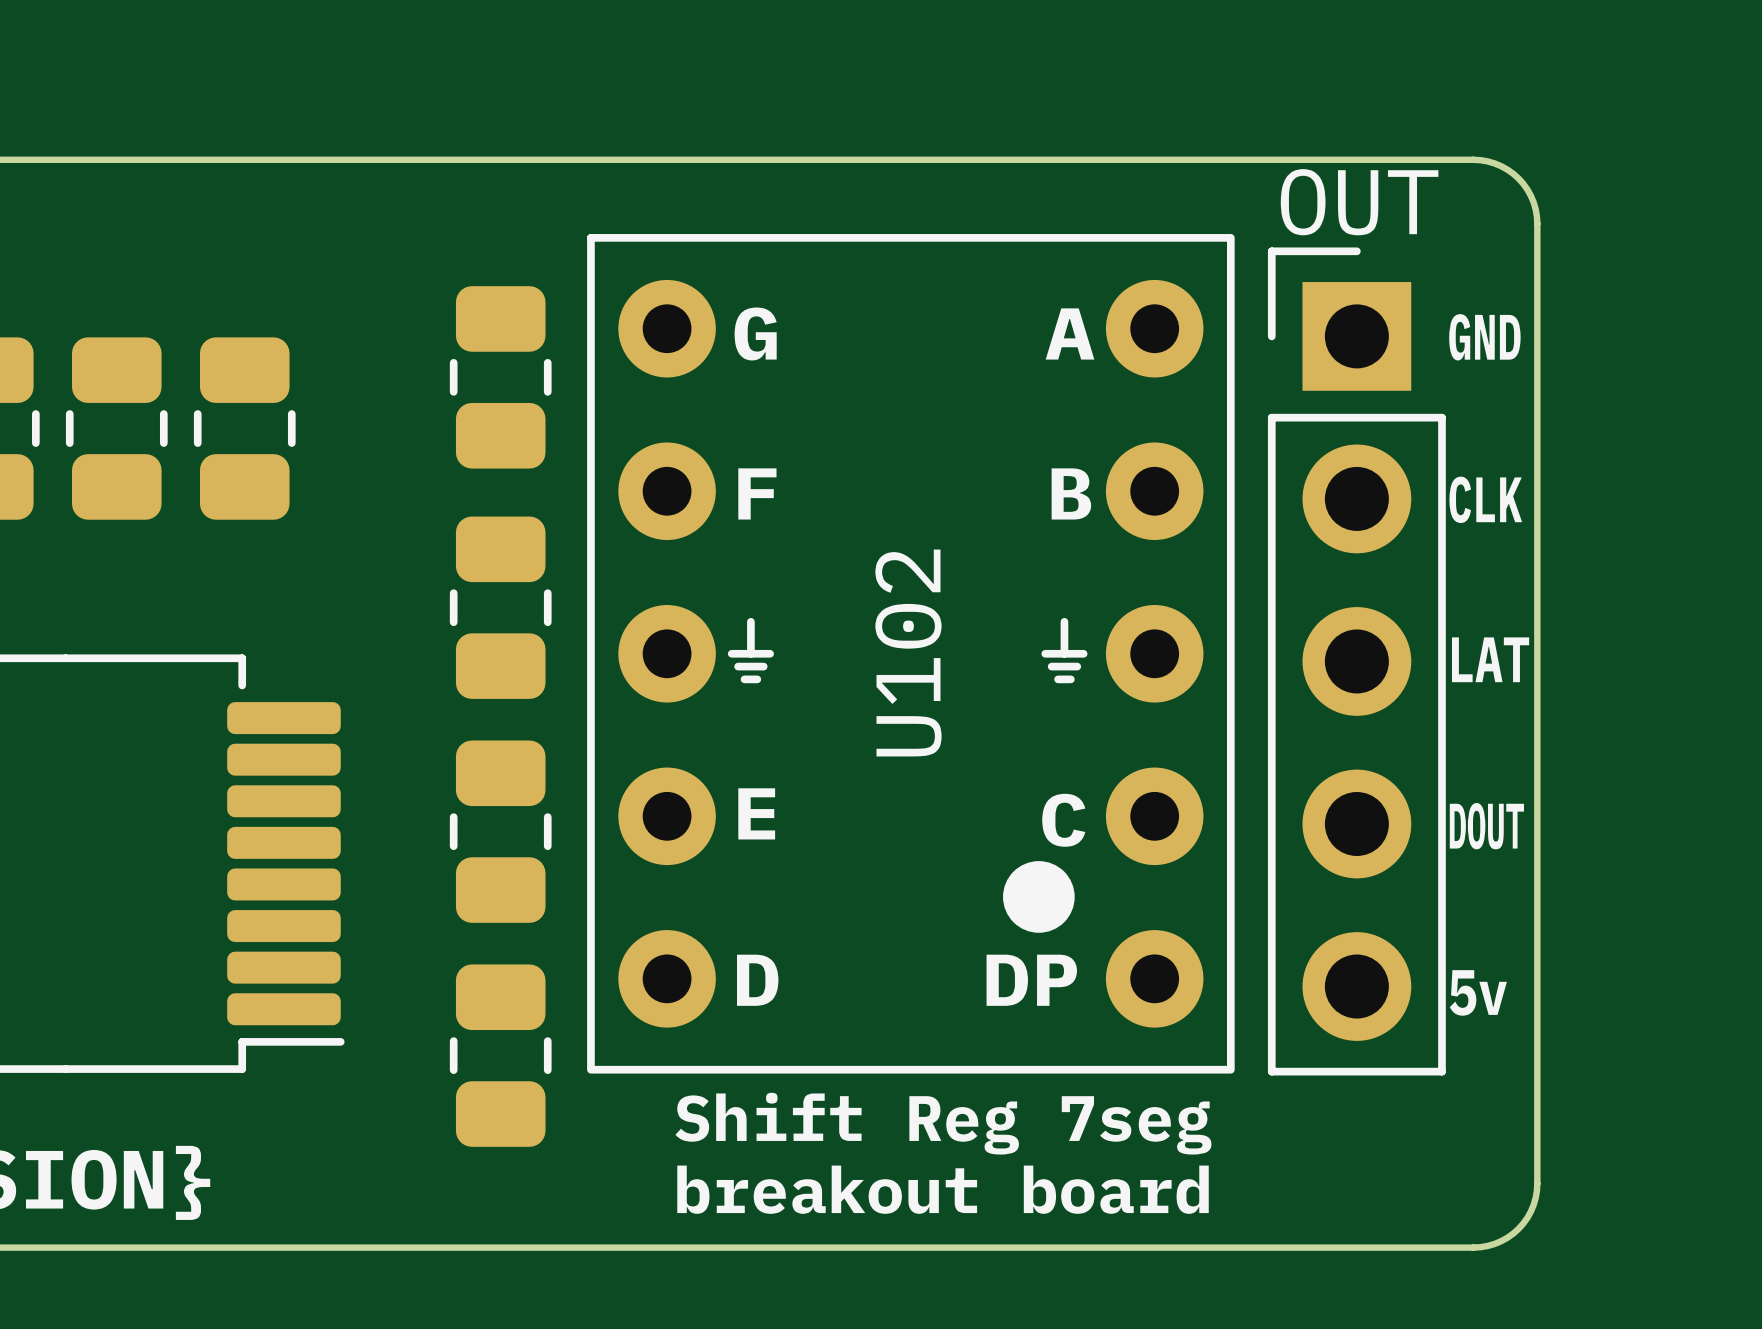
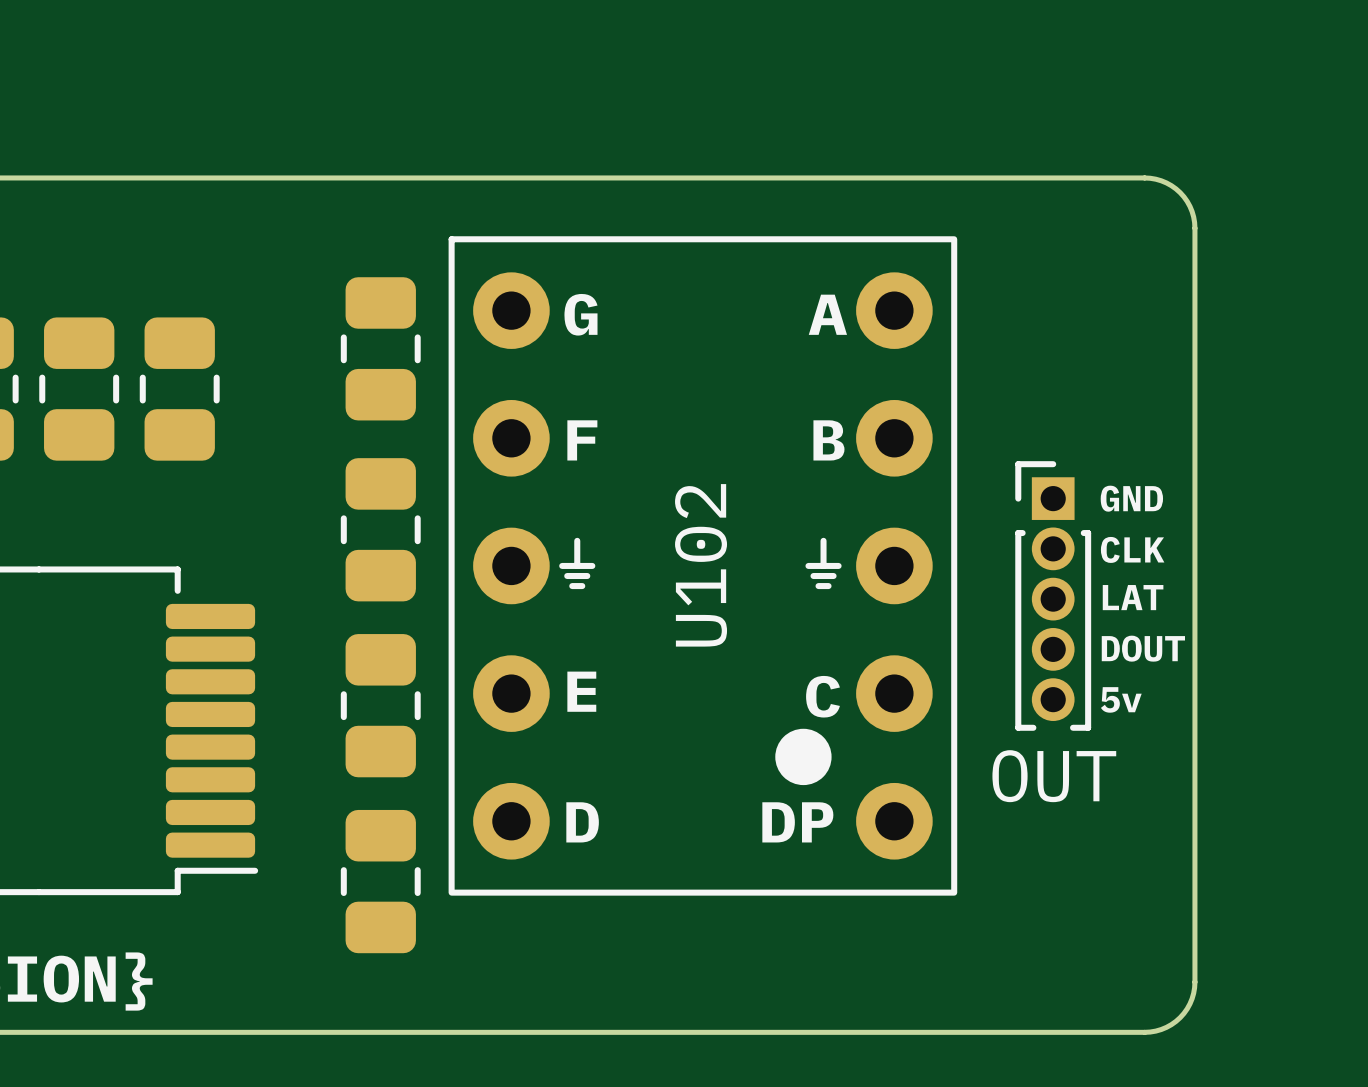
part value position: OUT (1359, 202) -> OUT (1054, 776)
part footprint: [1267, 247, 1446, 1076] -> [1015, 461, 1092, 731]
text position: GND (1484, 337) -> GND (1131, 498)
text position: CLK (1485, 499) -> CLK (1132, 549)
text position: LAT (1490, 659) -> LAT (1133, 597)
text: none -> DOUT (1143, 648)
text: DOUT (1486, 826) -> 5v (1121, 699)
text: 5v (1478, 992) -> none
text: Shift Reg 7seg (943, 1123) -> none
text: breakout board (943, 1189) -> none

